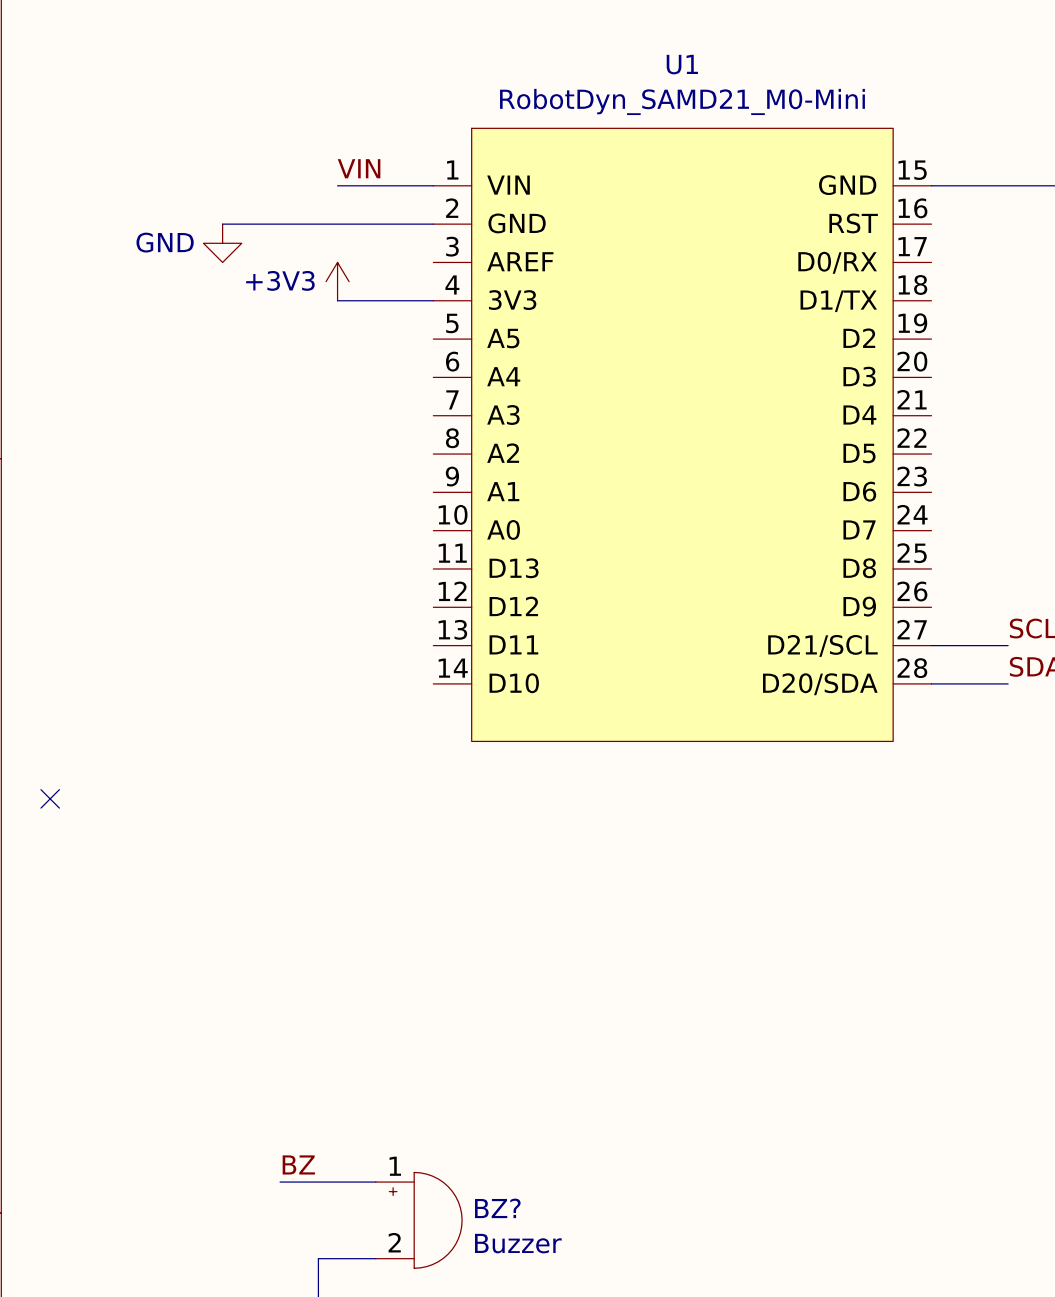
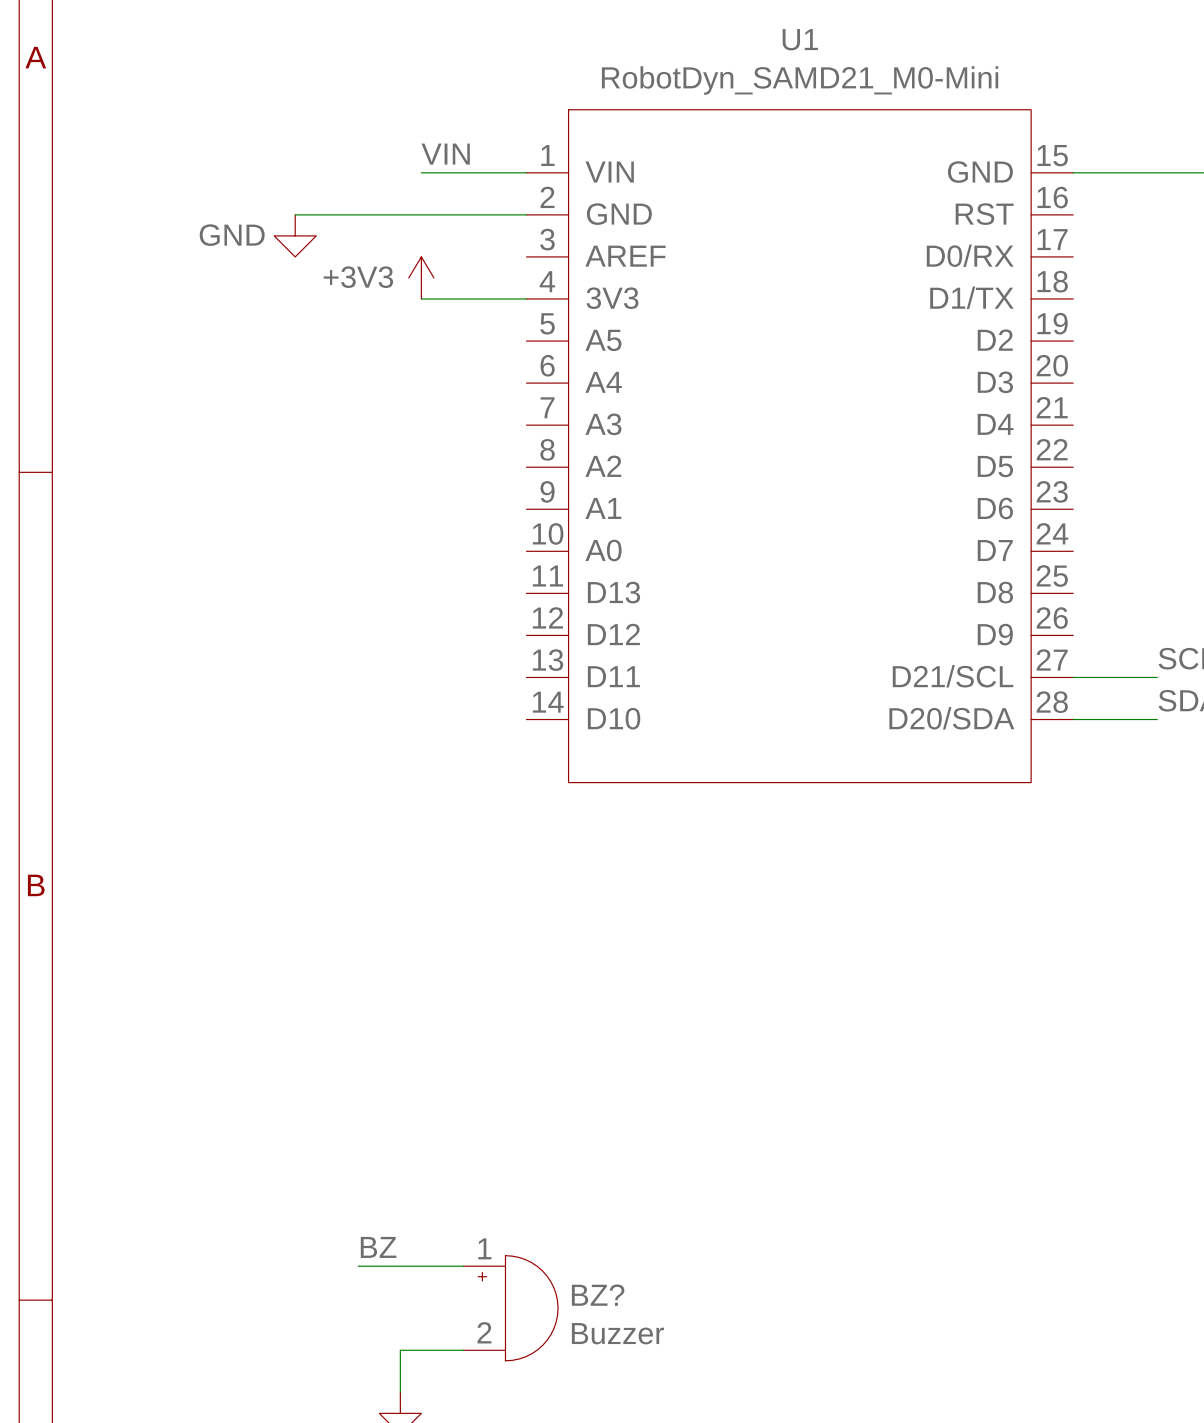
no-connect mark: (50, 798) -> none

